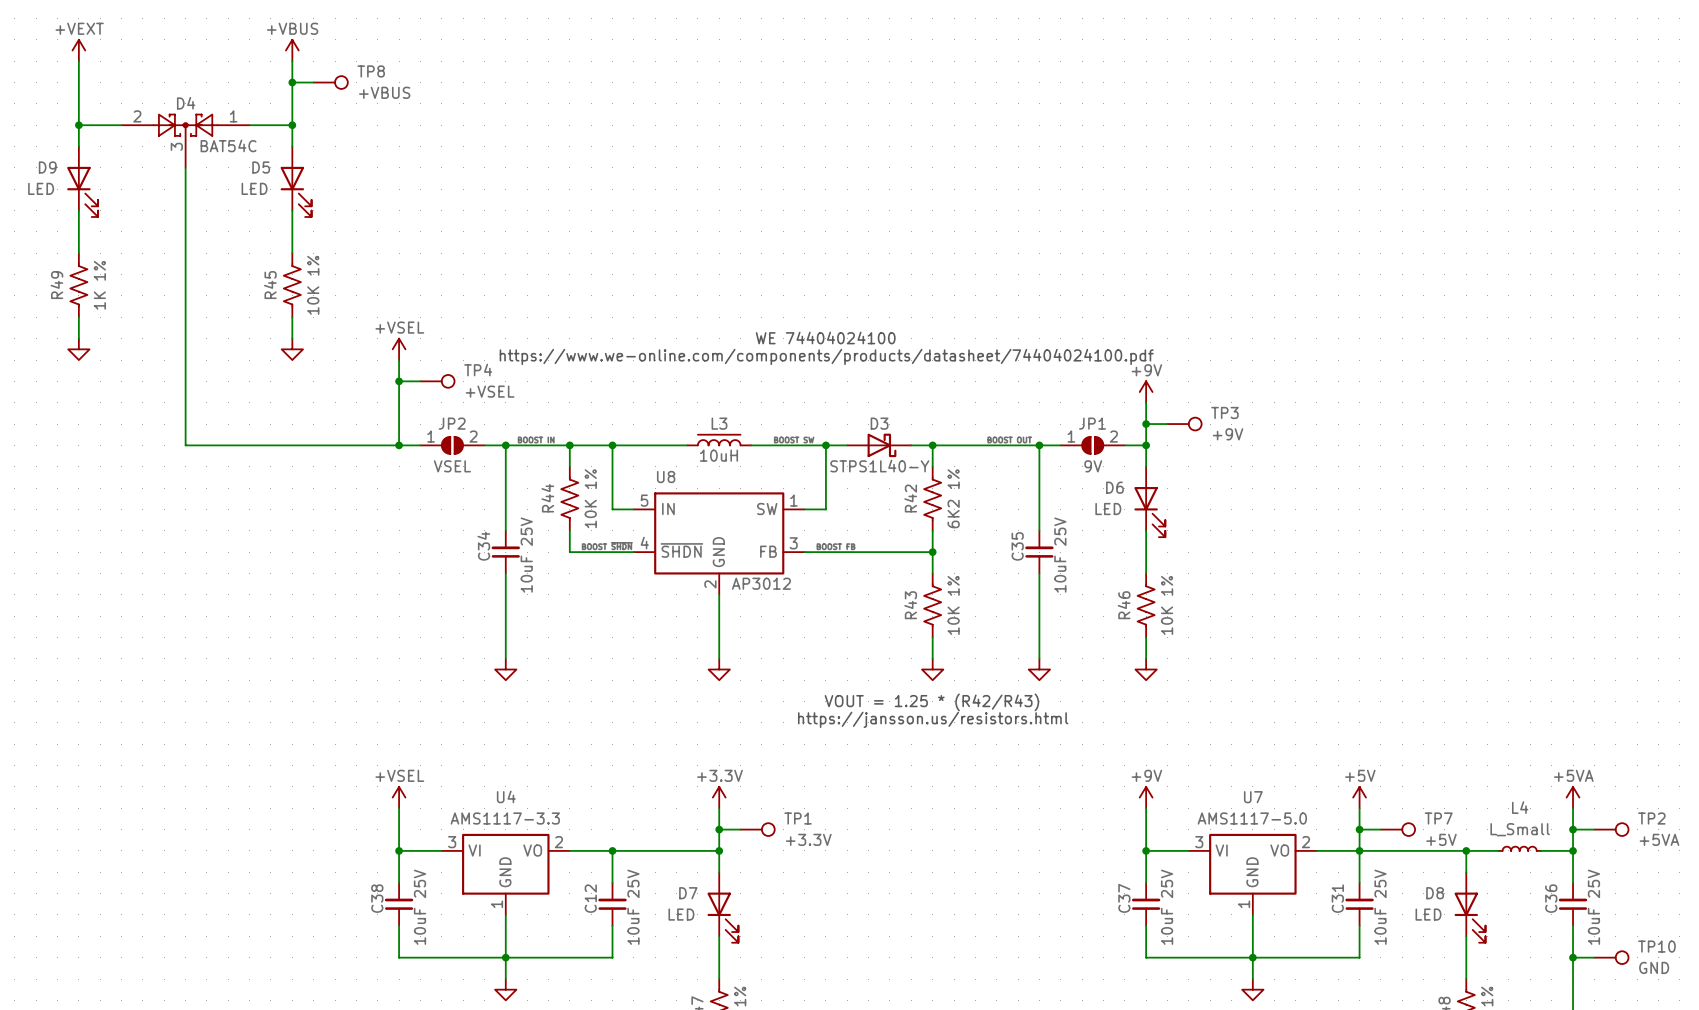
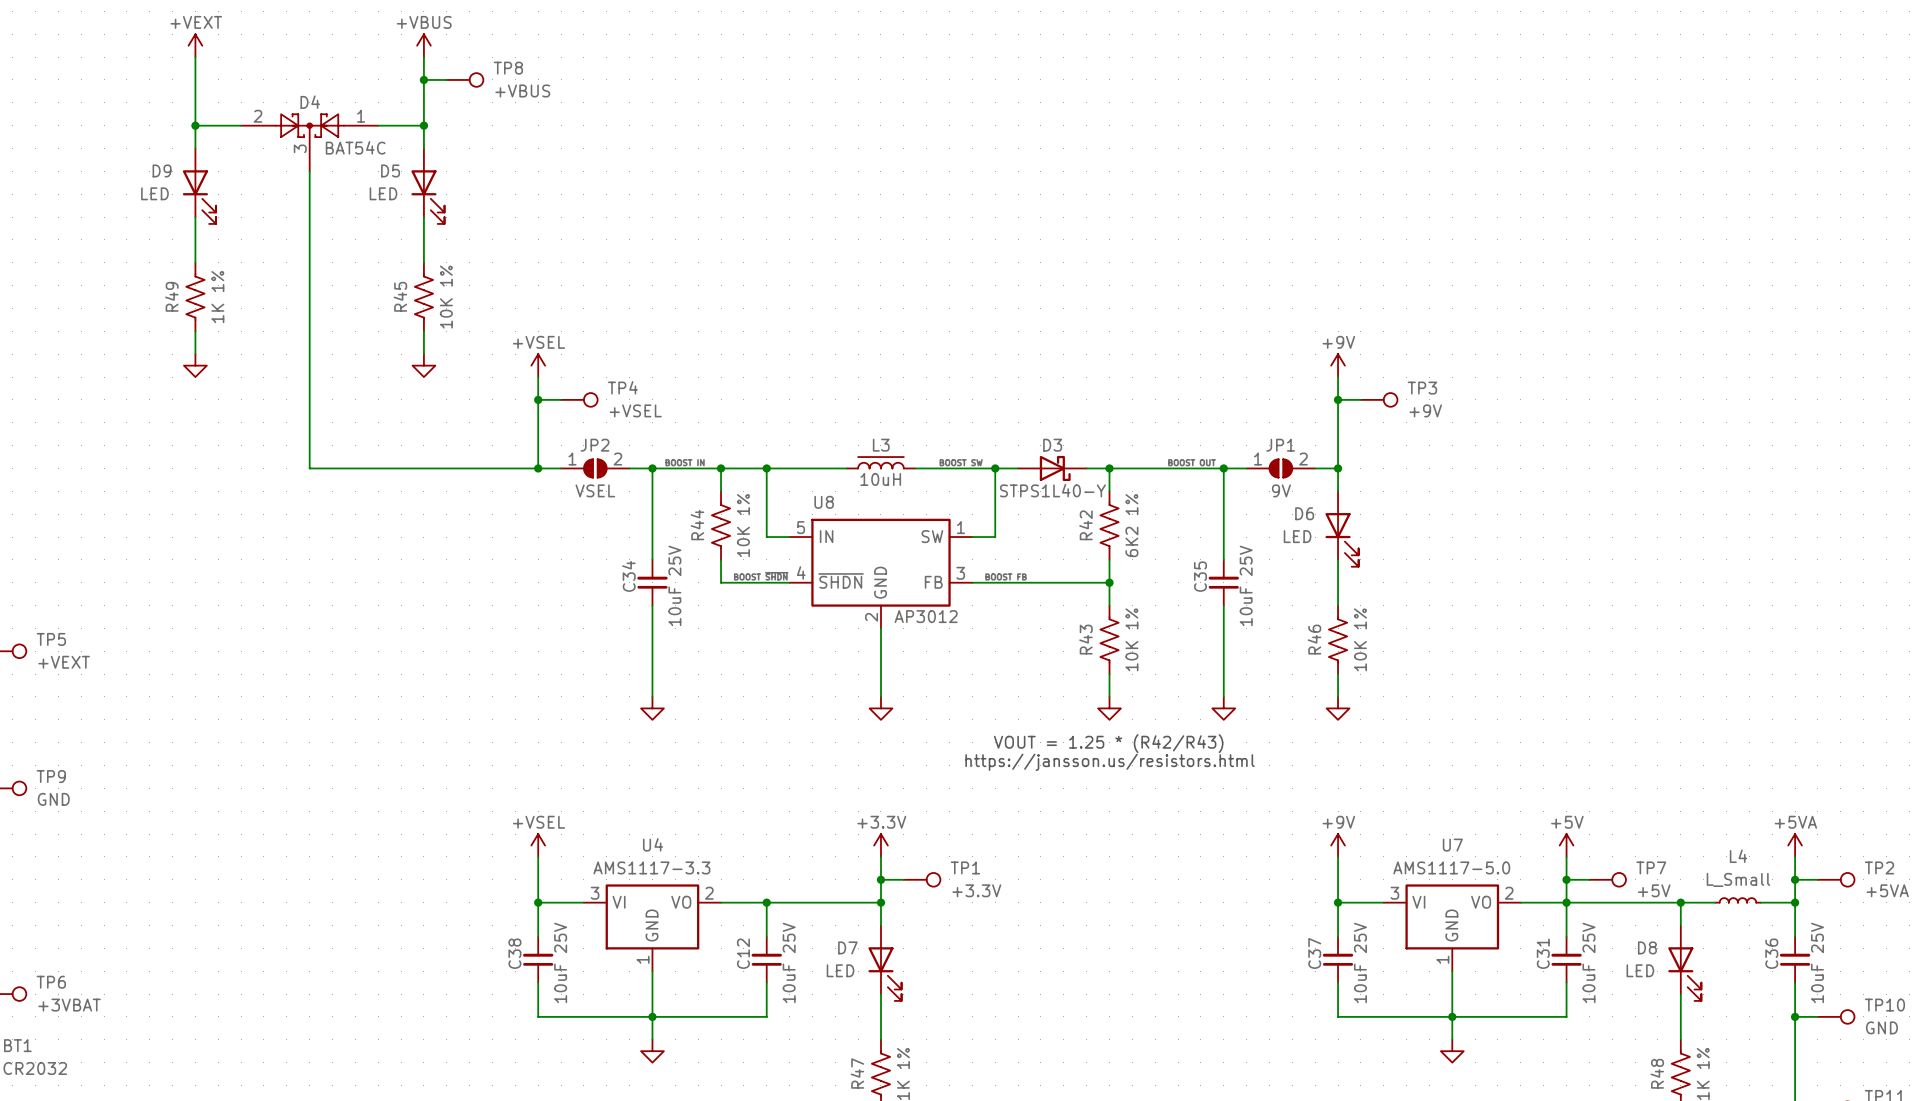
text: WE 74404024100 (825, 337) -> none
text: https://www.we-online.com/components/products/datasheet/74404024100.pdf (826, 356) -> none
power symbol position: +9V (1146, 392) -> +9V (1338, 365)
wire: (1146, 424) (1167, 424) -> (1338, 399) (1360, 399)
junction position: (1146, 424) -> (1338, 399)
TP3 position: (1184, 424) -> (1379, 399)

